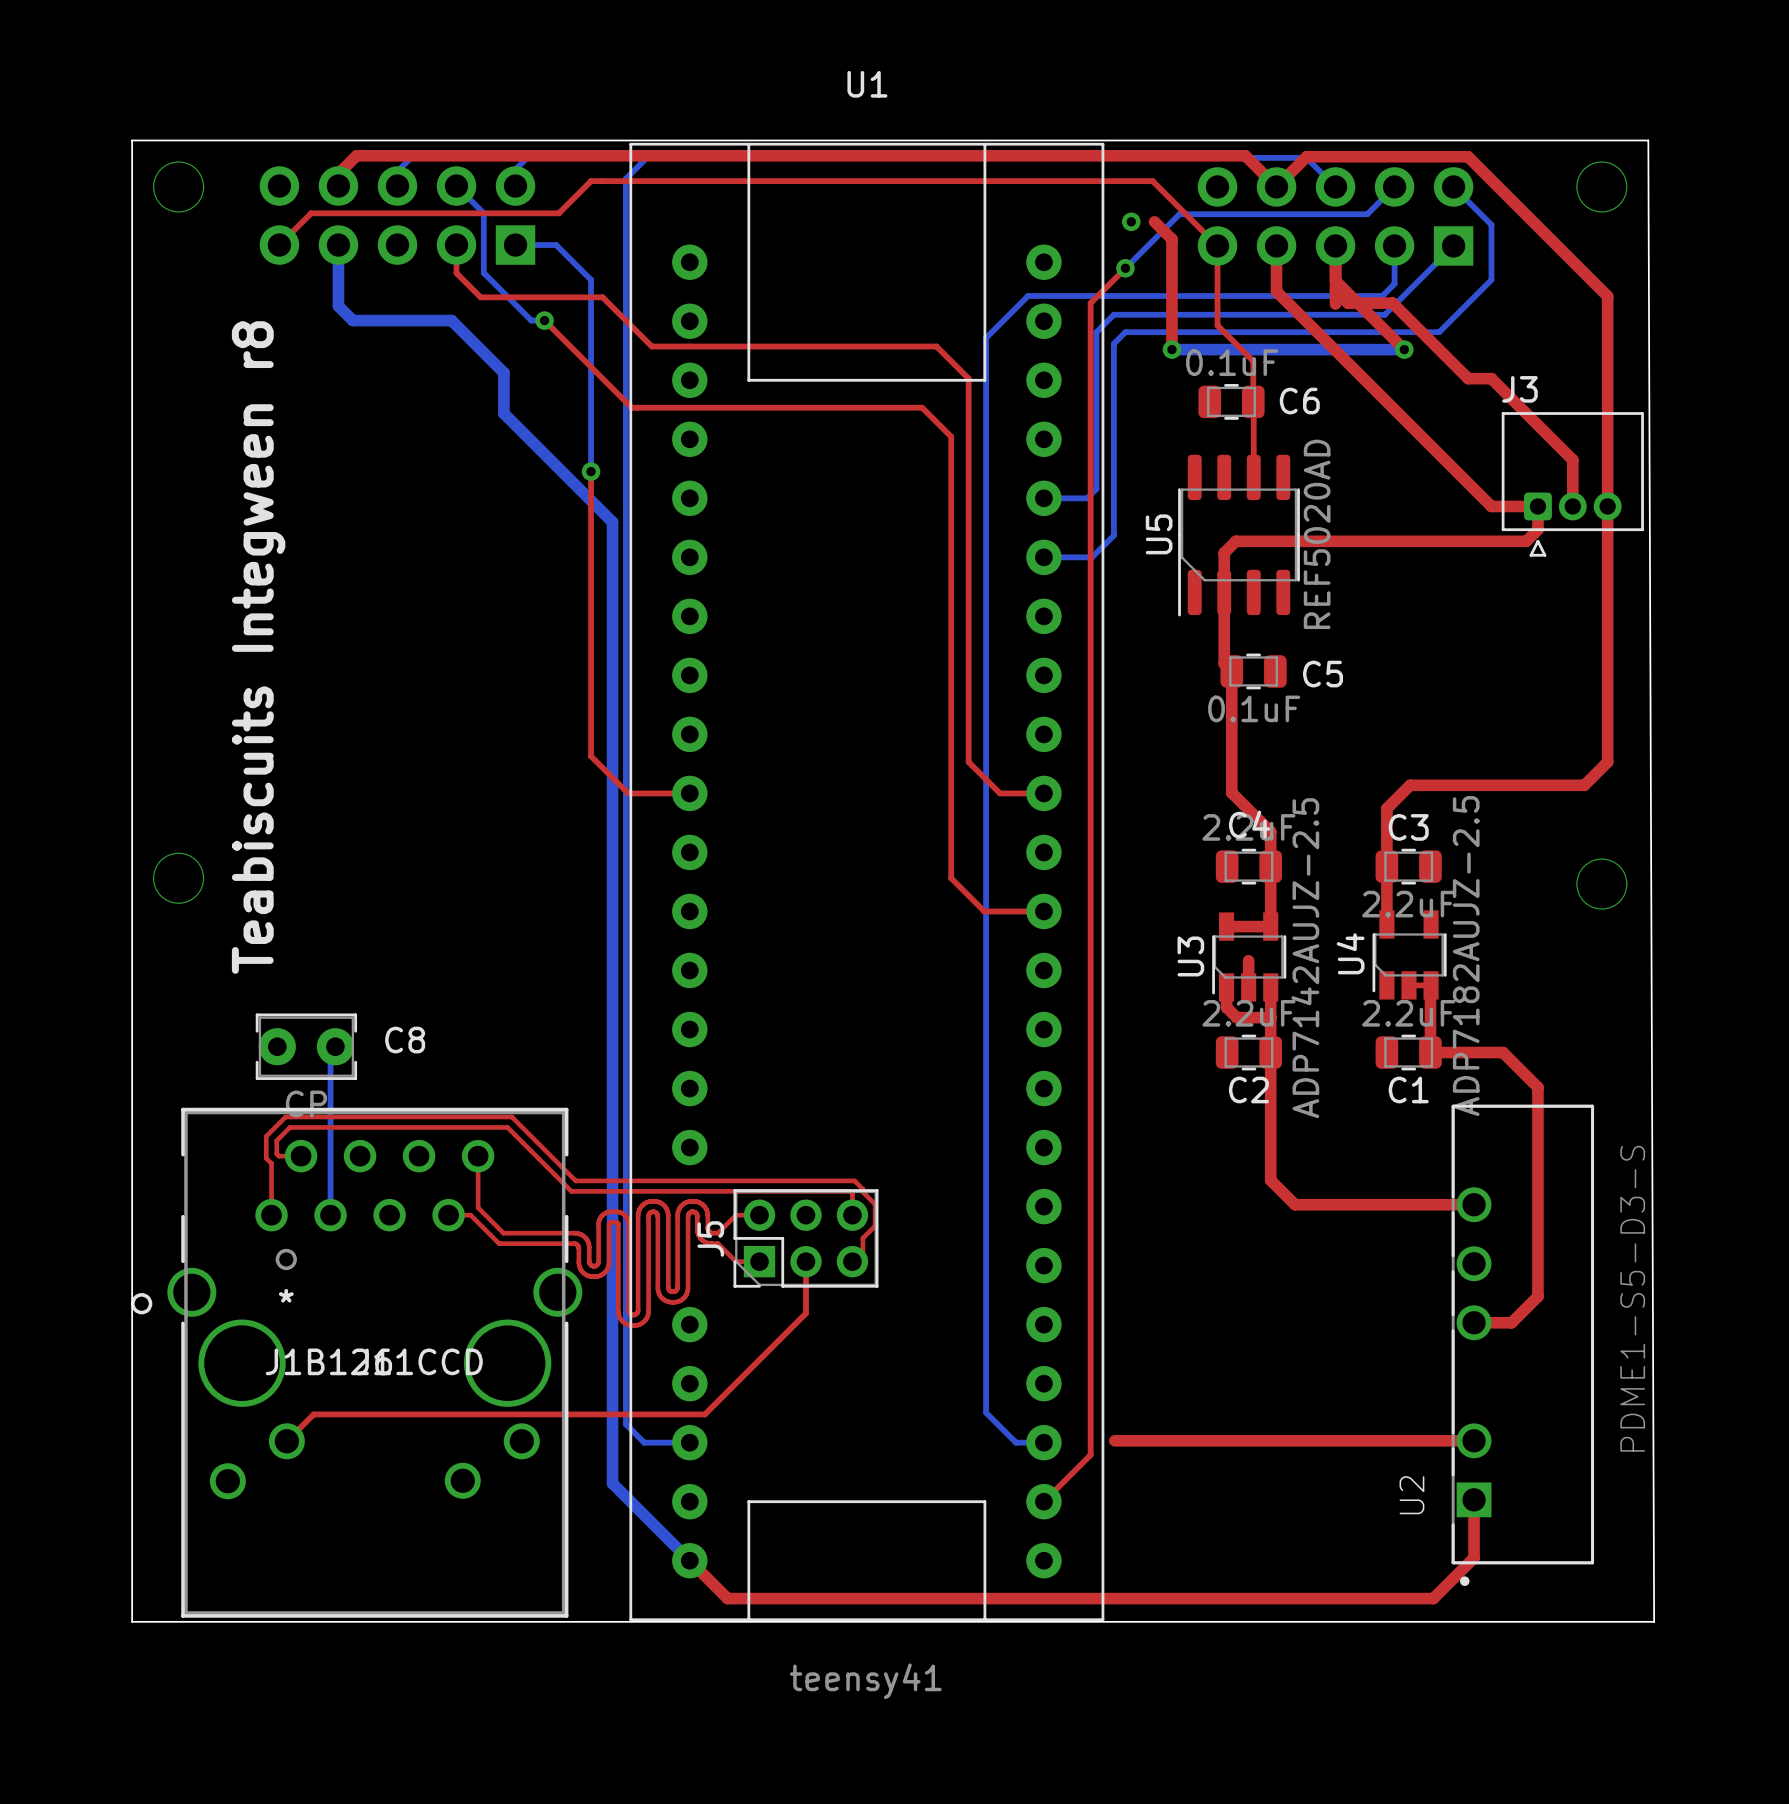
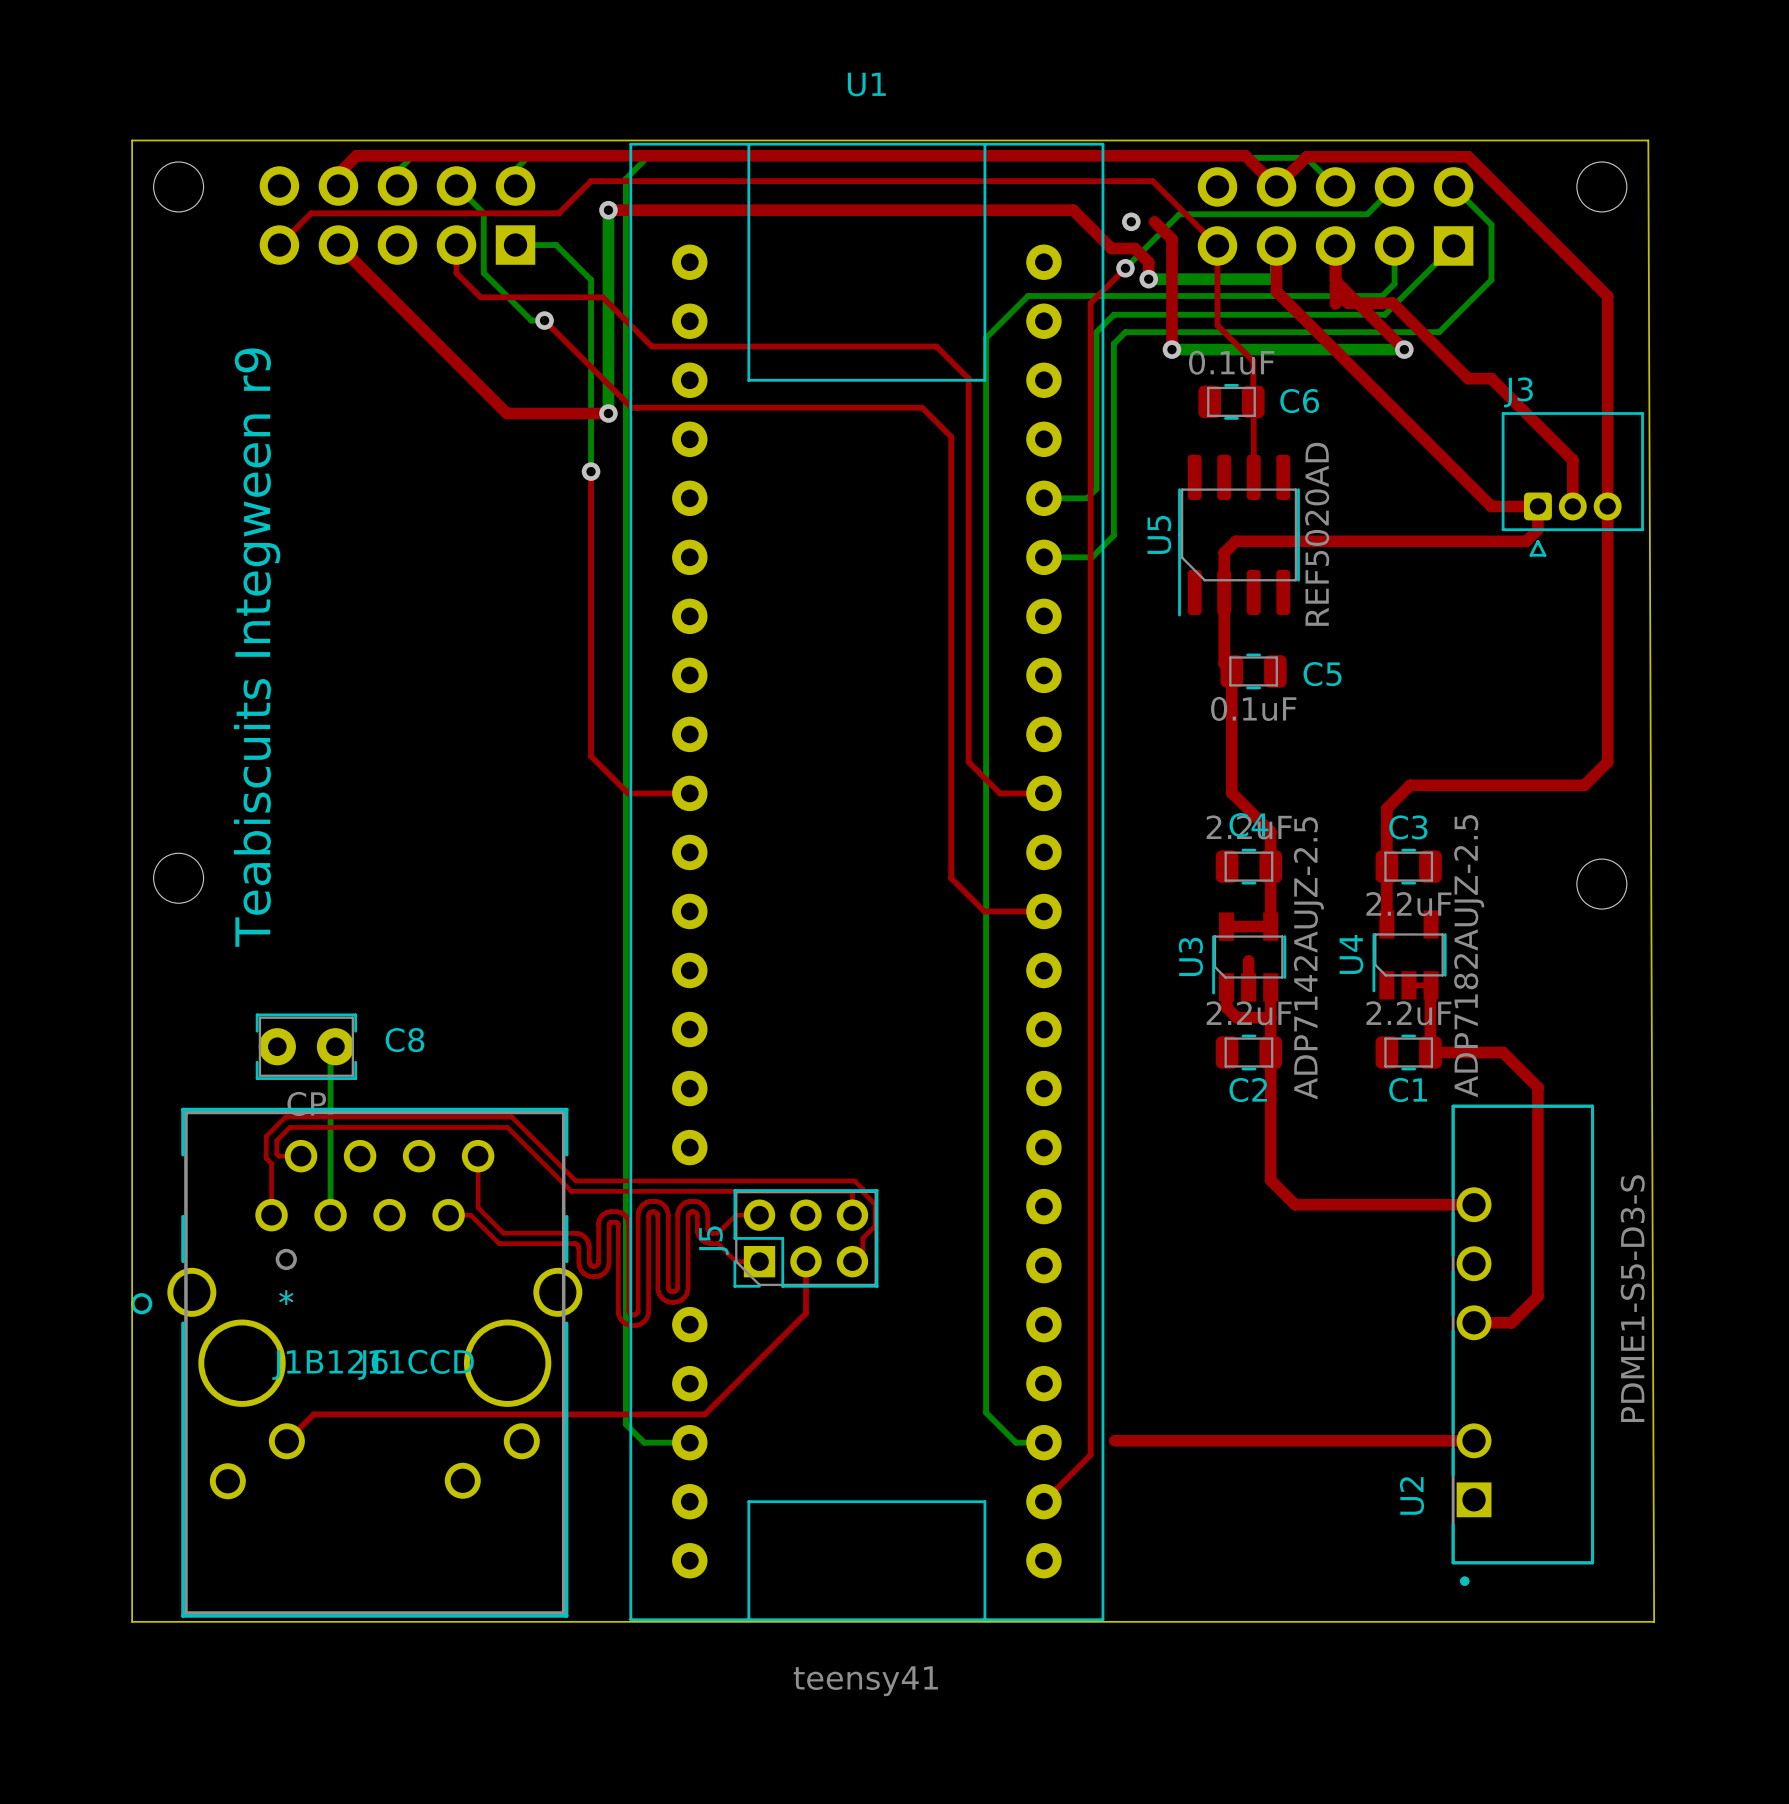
top track: none -> (608, 210) (1073, 210) (1111, 248) (1134, 248) (1148, 262) (1148, 279)
bottom track: none -> (608, 210) (608, 413)
via: none -> (608, 210)
top track: none -> (338, 245) (506, 413) (608, 413)
bottom track: (338, 245) (338, 306) (352, 320) (451, 320) (503, 372) (503, 413) (612, 522) (612, 1483) (689, 1560) -> none
bottom track: none -> (1276, 245) (1275, 279) (1148, 279)
via: none -> (1148, 279)
via: none -> (608, 413)
text: Teabiscuits Integween r8 (258, 647) -> Teabiscuits Integween r9 (257, 647)
top track: (1474, 1499) (1474, 1557) (1433, 1598) (727, 1598) (689, 1560) -> none

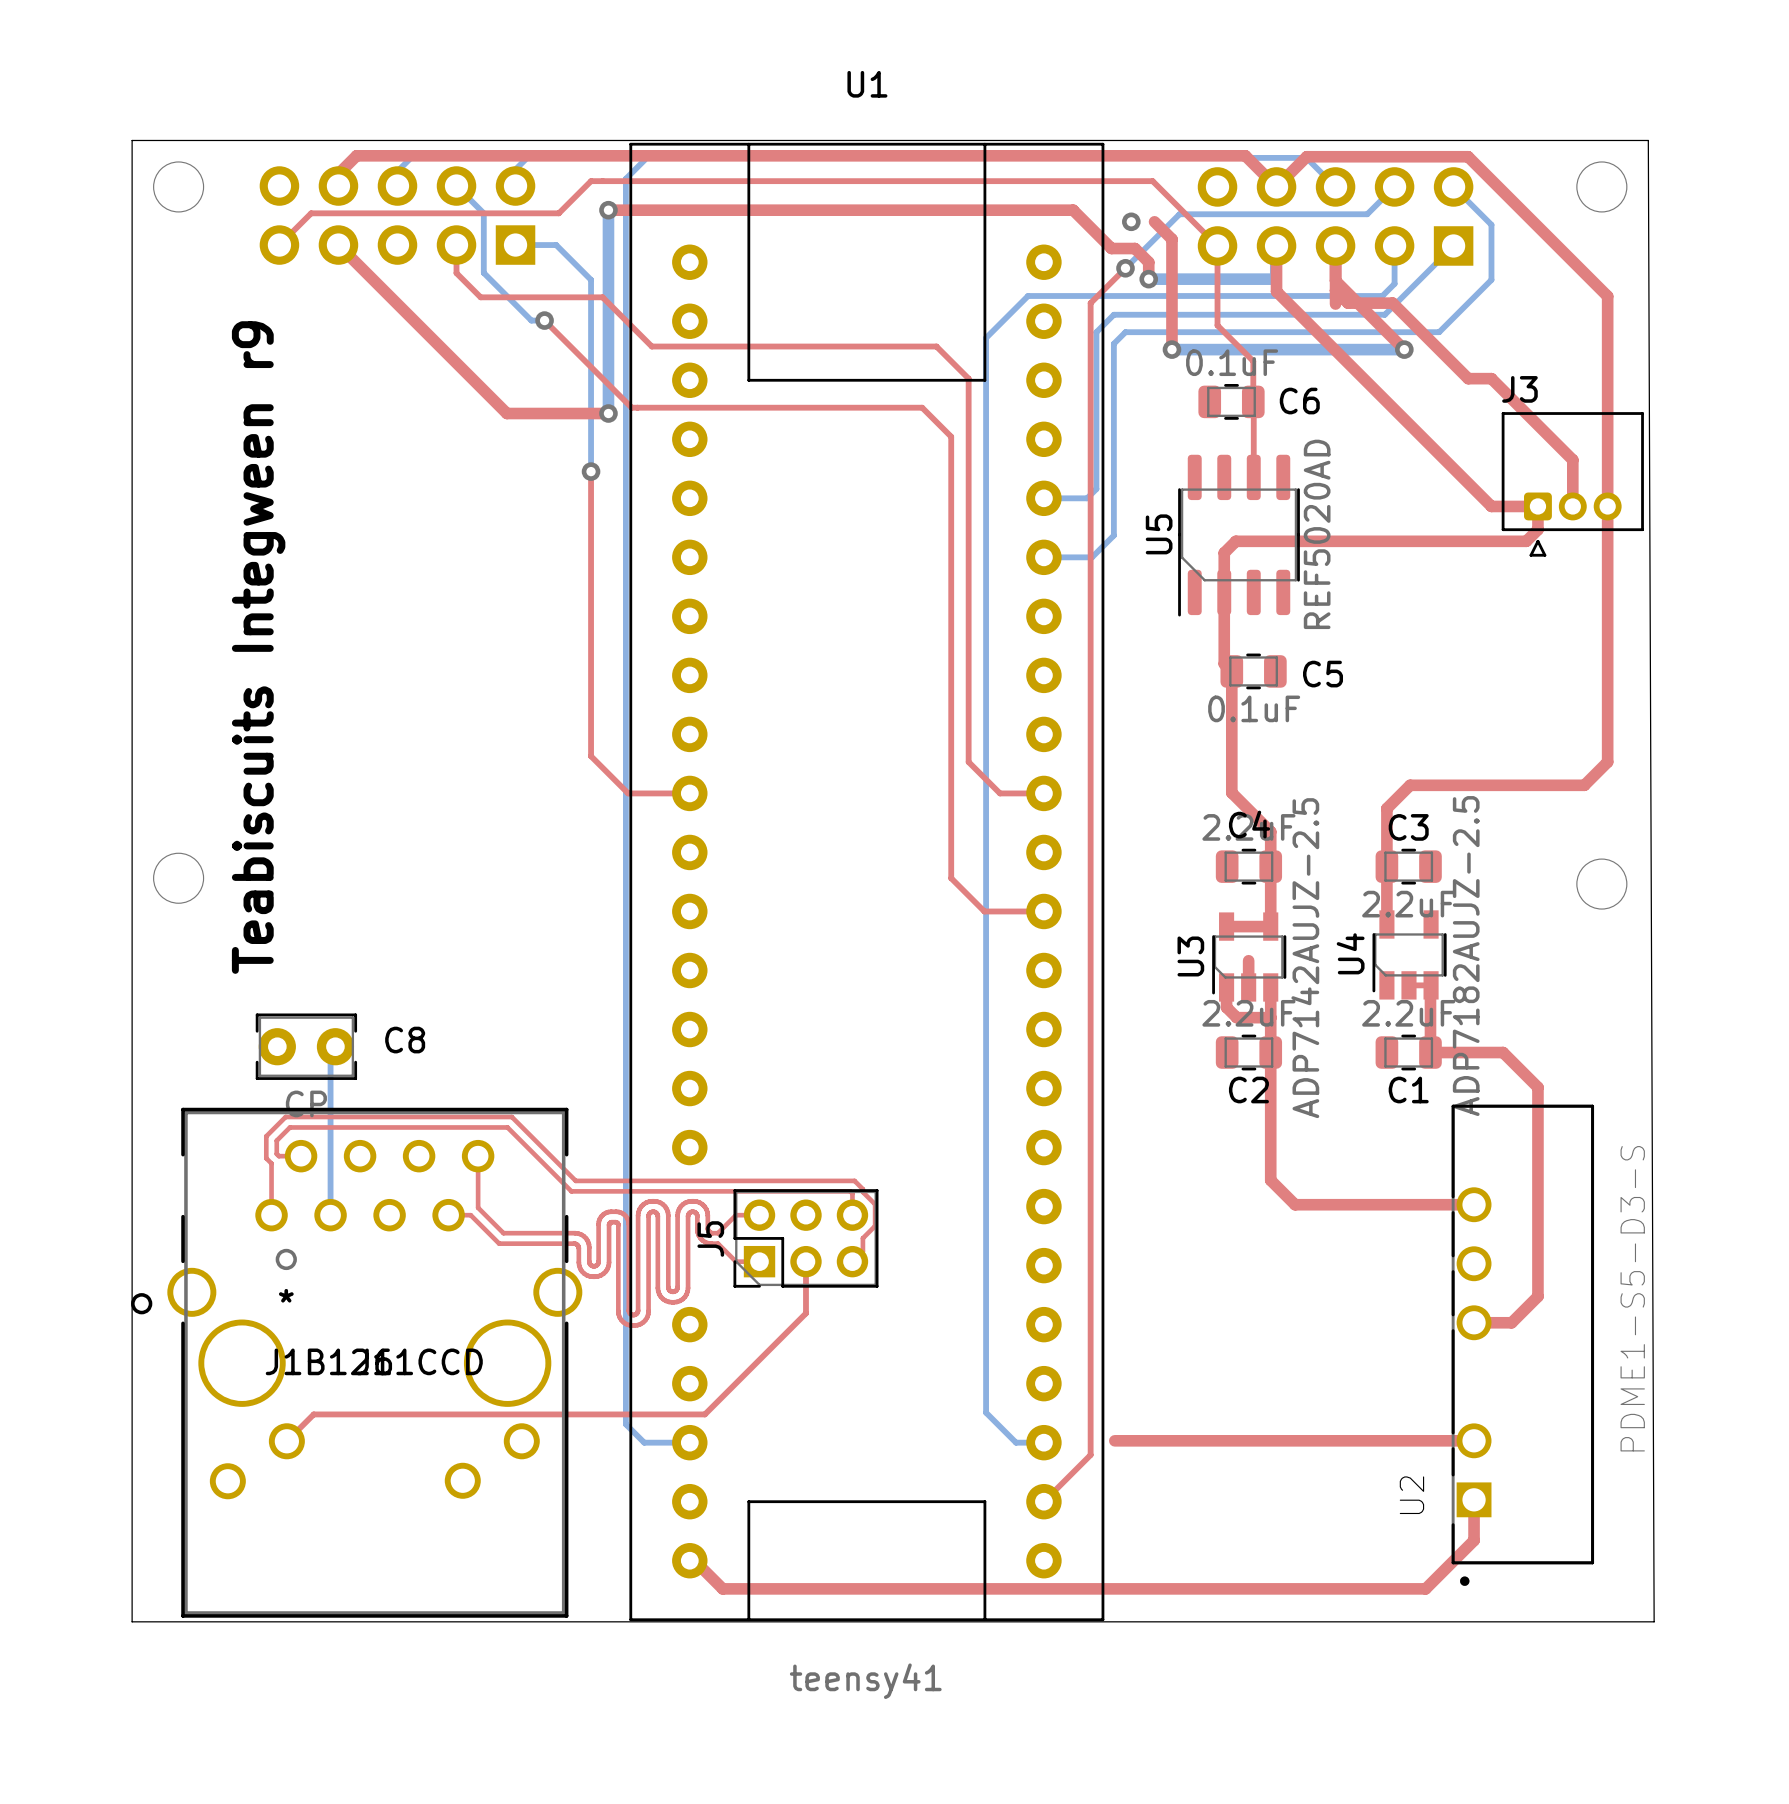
top track: none -> (1474, 1499) (1474, 1540) (1425, 1588) (722, 1588) (694, 1560) (689, 1560)

